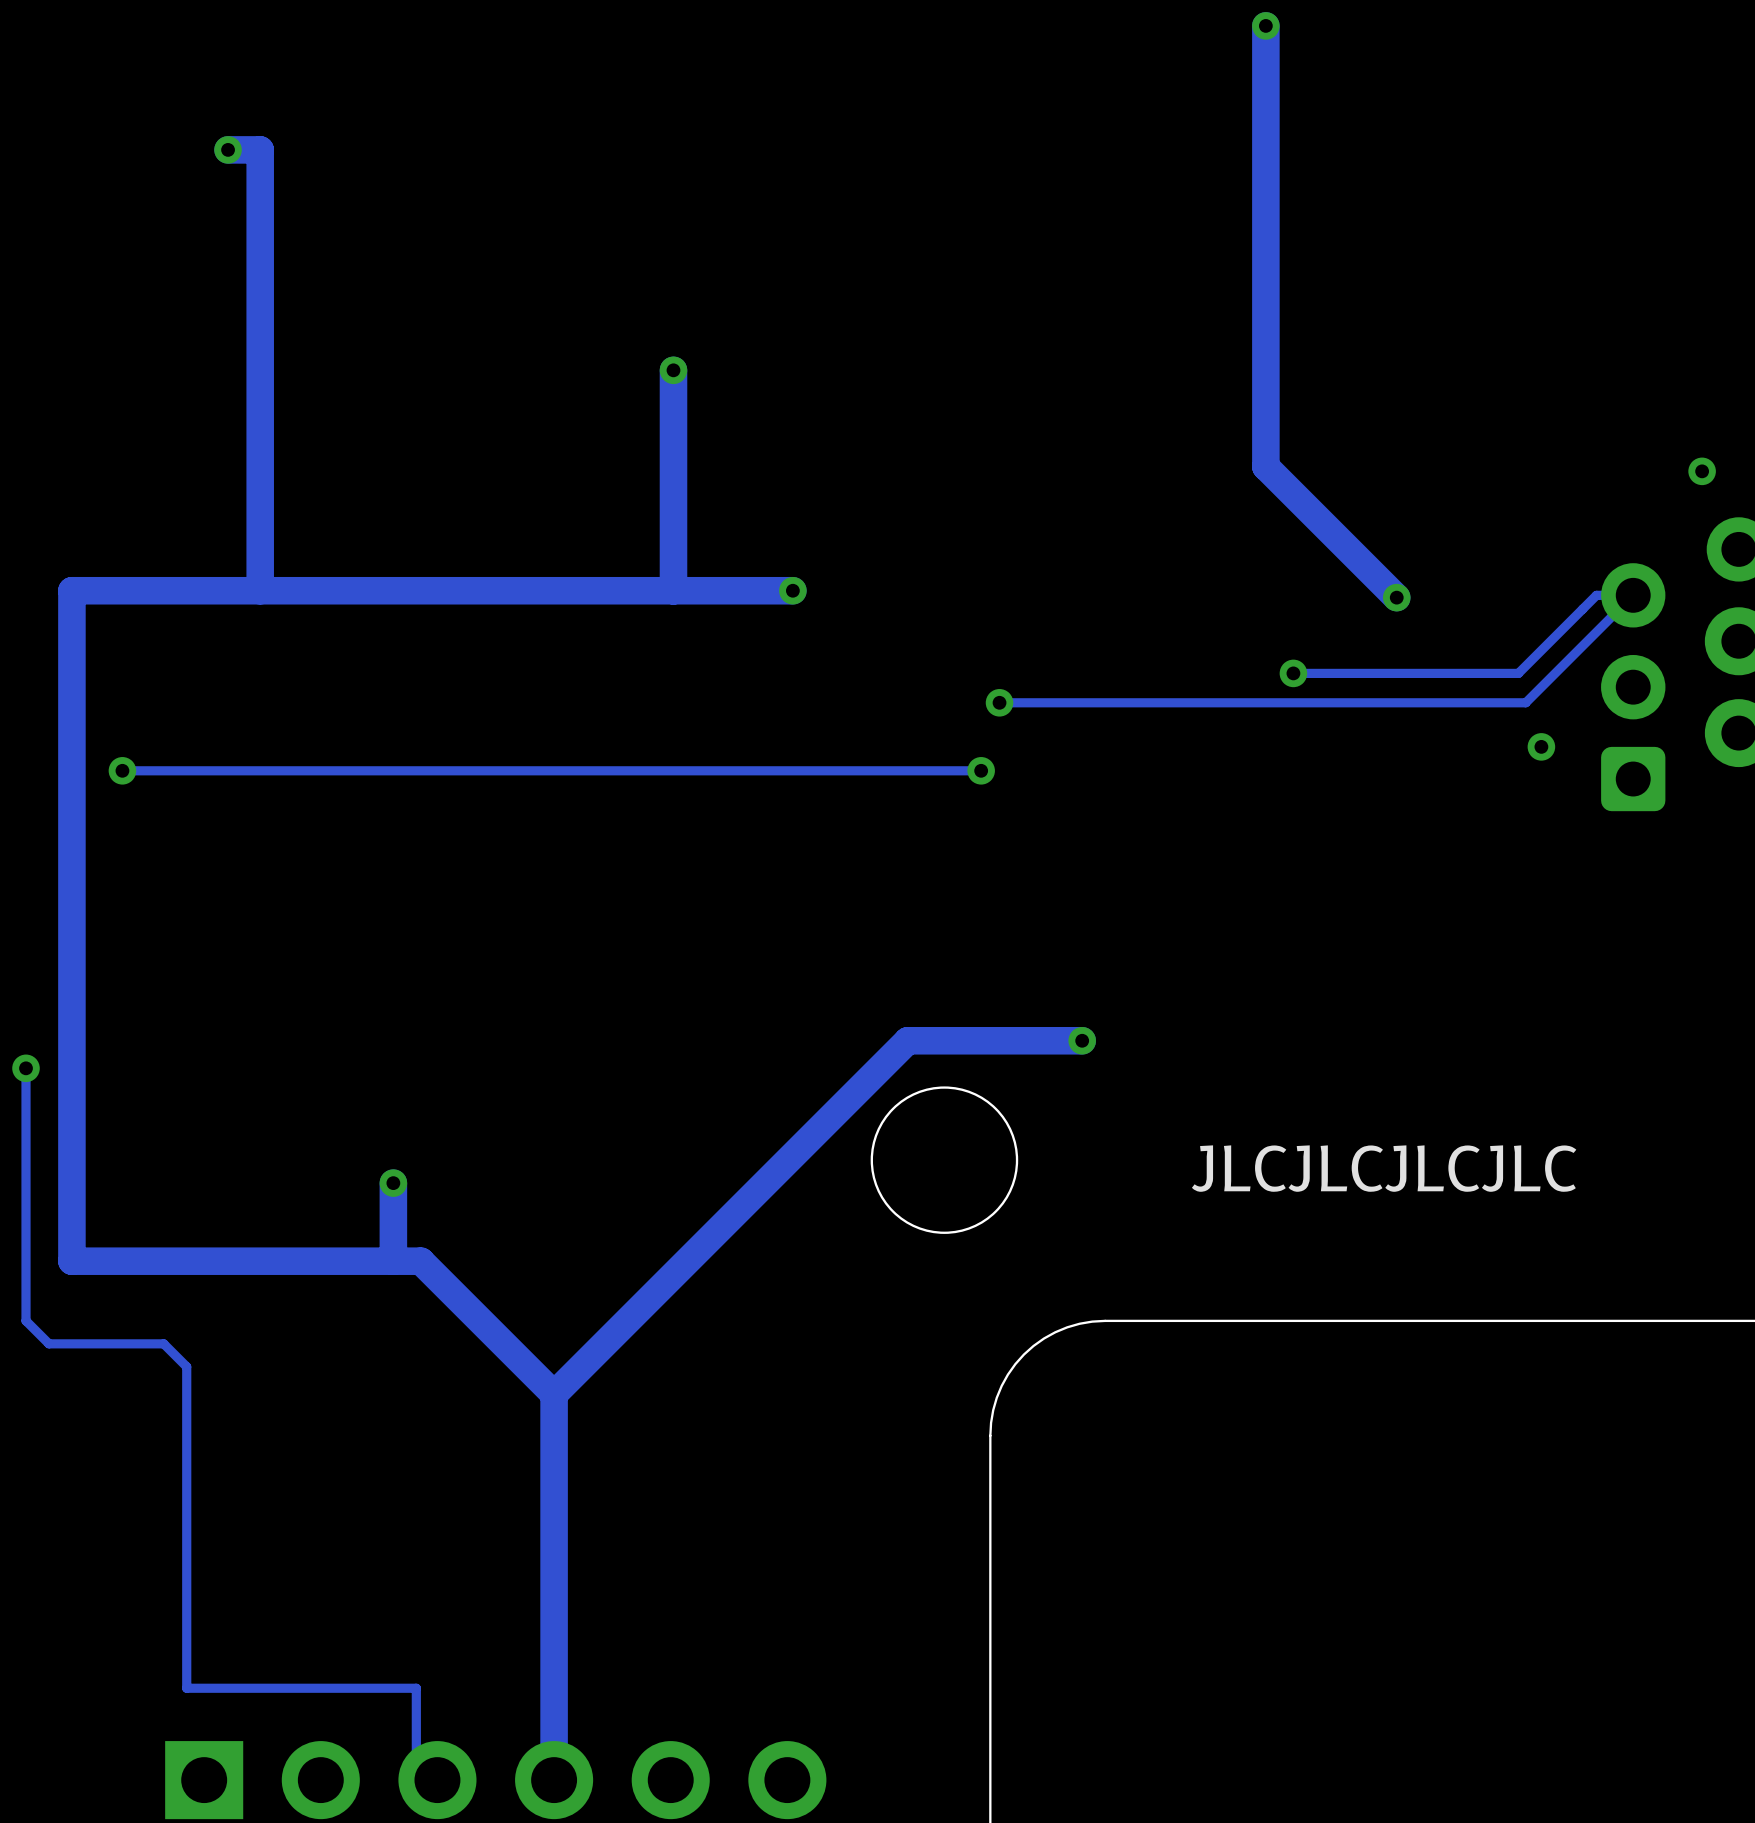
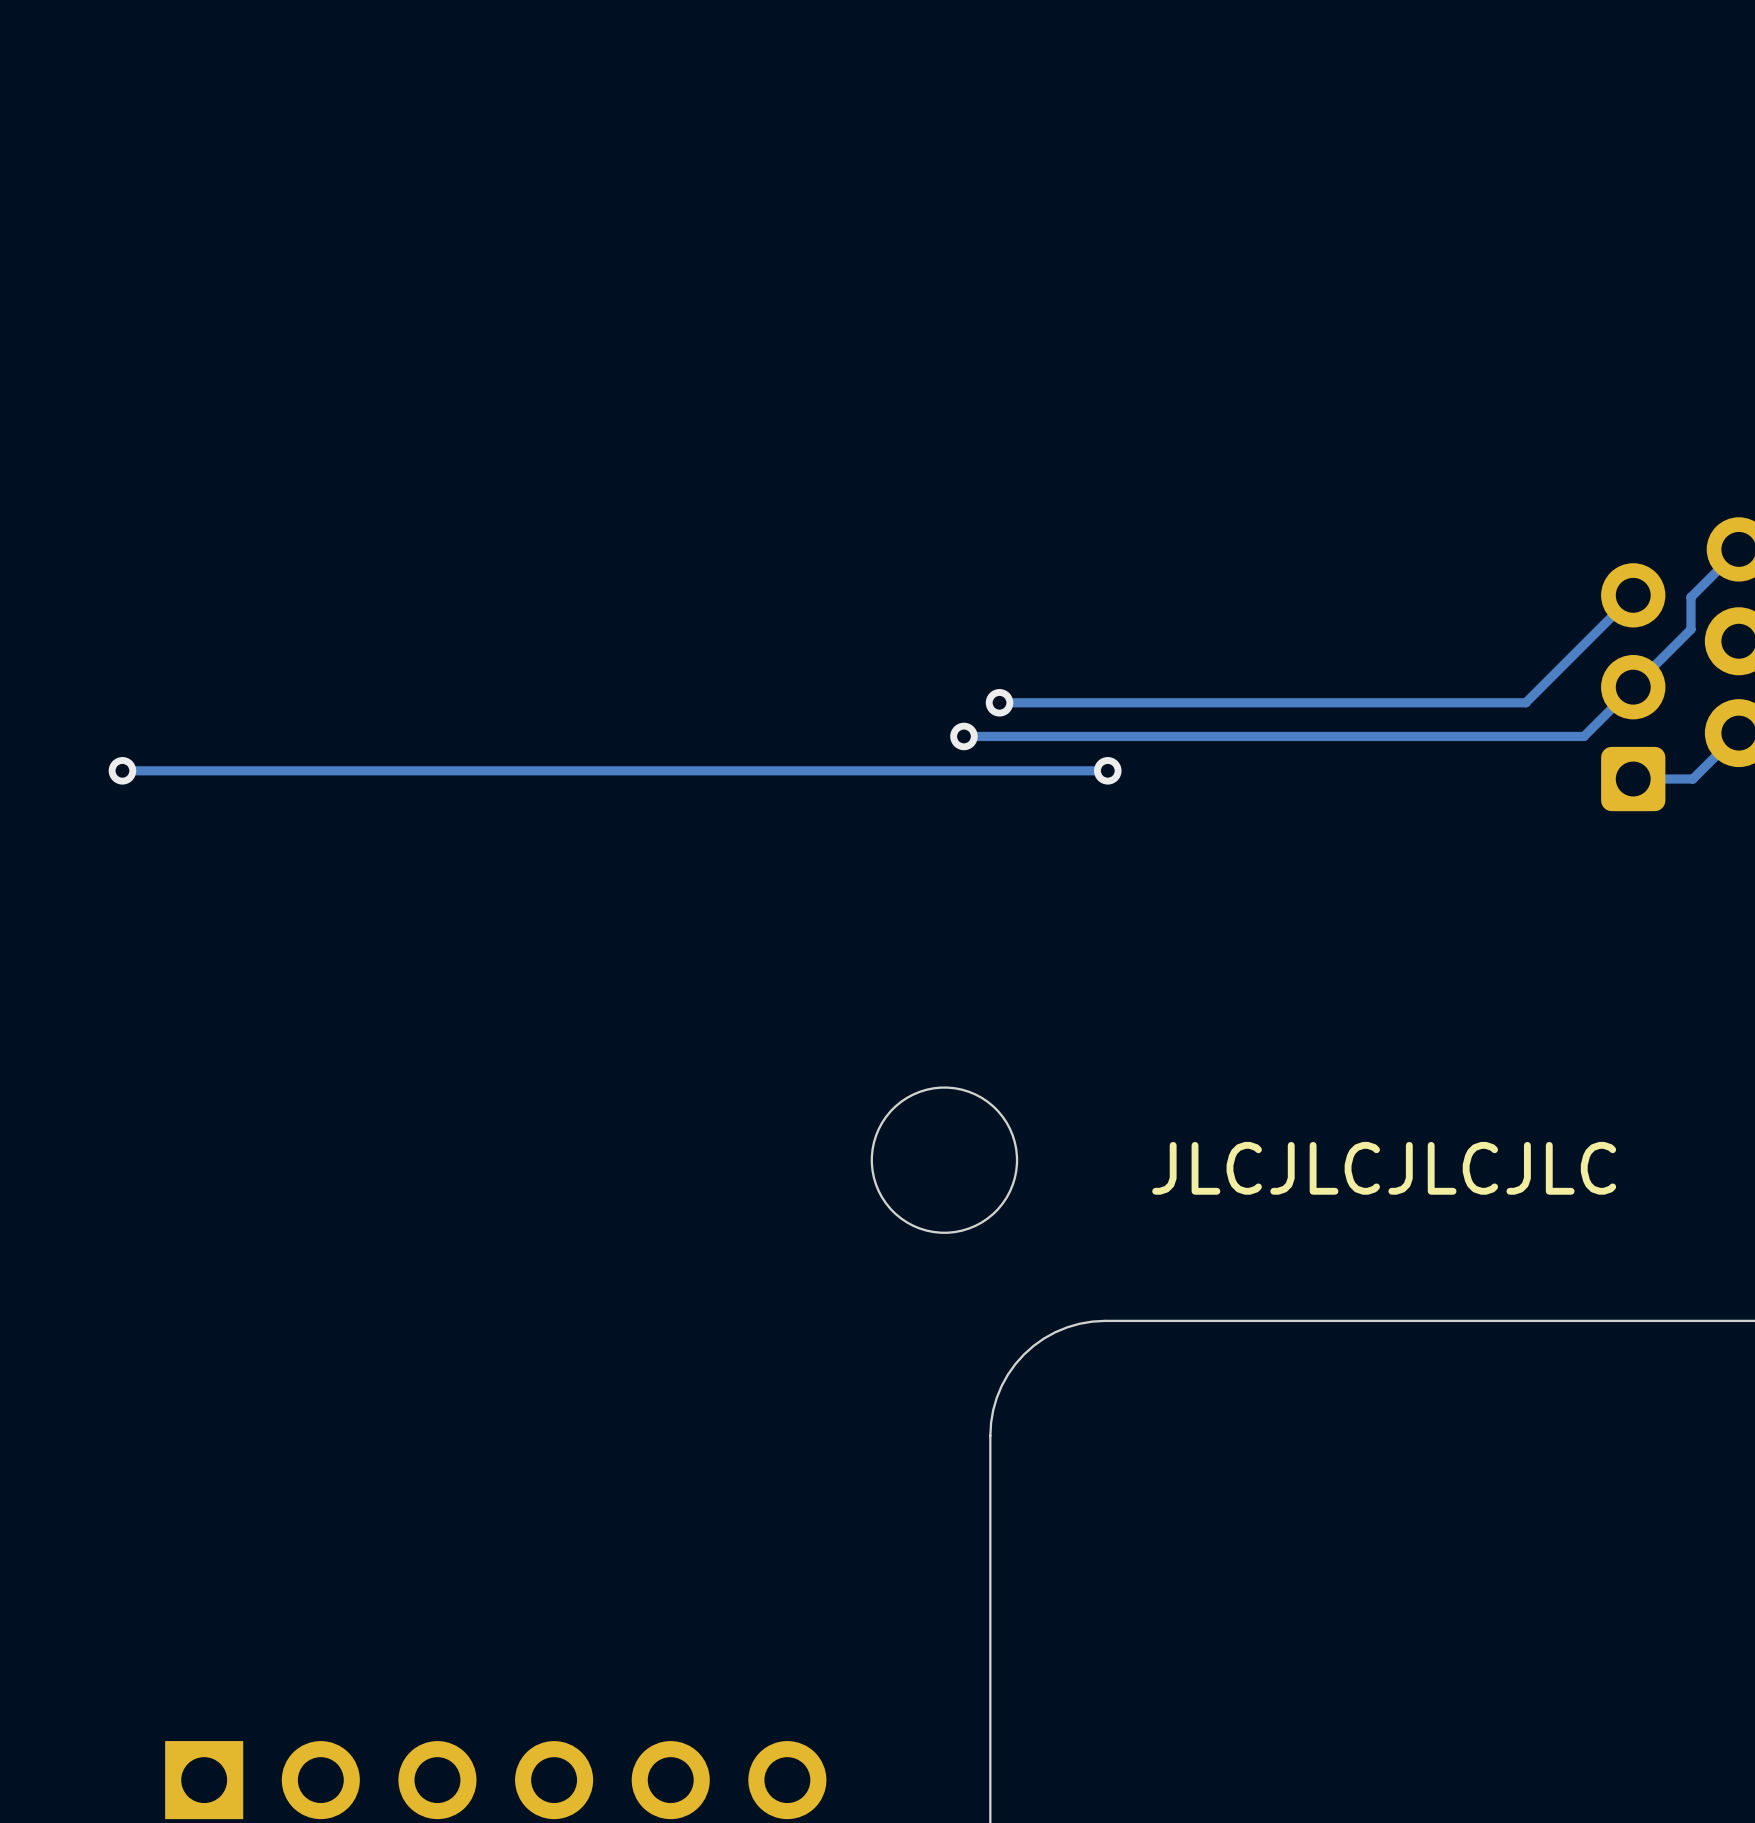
track: (1265, 25) (1265, 466) (1396, 597) -> none
via: (1265, 25) -> none
track: (228, 149) (260, 149) (260, 590) -> none
via: (228, 149) -> none
track: (673, 370) (673, 590) -> none
via: (673, 370) -> none
via: (1702, 471) -> none
track: none -> (1738, 549) (1690, 597) (1690, 629) (1583, 736) (963, 736)
track: (792, 590) (71, 590) (71, 1261) (420, 1261) (554, 1394) -> none
via: (792, 590) -> none
track: (1633, 595) (1596, 595) (1518, 673) (1293, 673) -> none
via: (1396, 597) -> none
via: (1293, 673) -> none
track: none -> (1738, 733) (1692, 779) (1633, 779)
via: (1541, 746) -> none
via position: (981, 770) -> (963, 736)
track: none -> (1107, 770) (981, 770)
via: none -> (1107, 770)
track: (1082, 1040) (907, 1040) (554, 1394) -> none
via: (1082, 1040) -> none
track: (26, 1068) (26, 1320) (48, 1343) (163, 1343) (186, 1366) (186, 1688) (416, 1688) (416, 1758) (437, 1780) -> none
via: (26, 1068) -> none
track: (393, 1183) (393, 1261) -> none
via: (393, 1183) -> none
track: (554, 1394) (554, 1780) -> none

